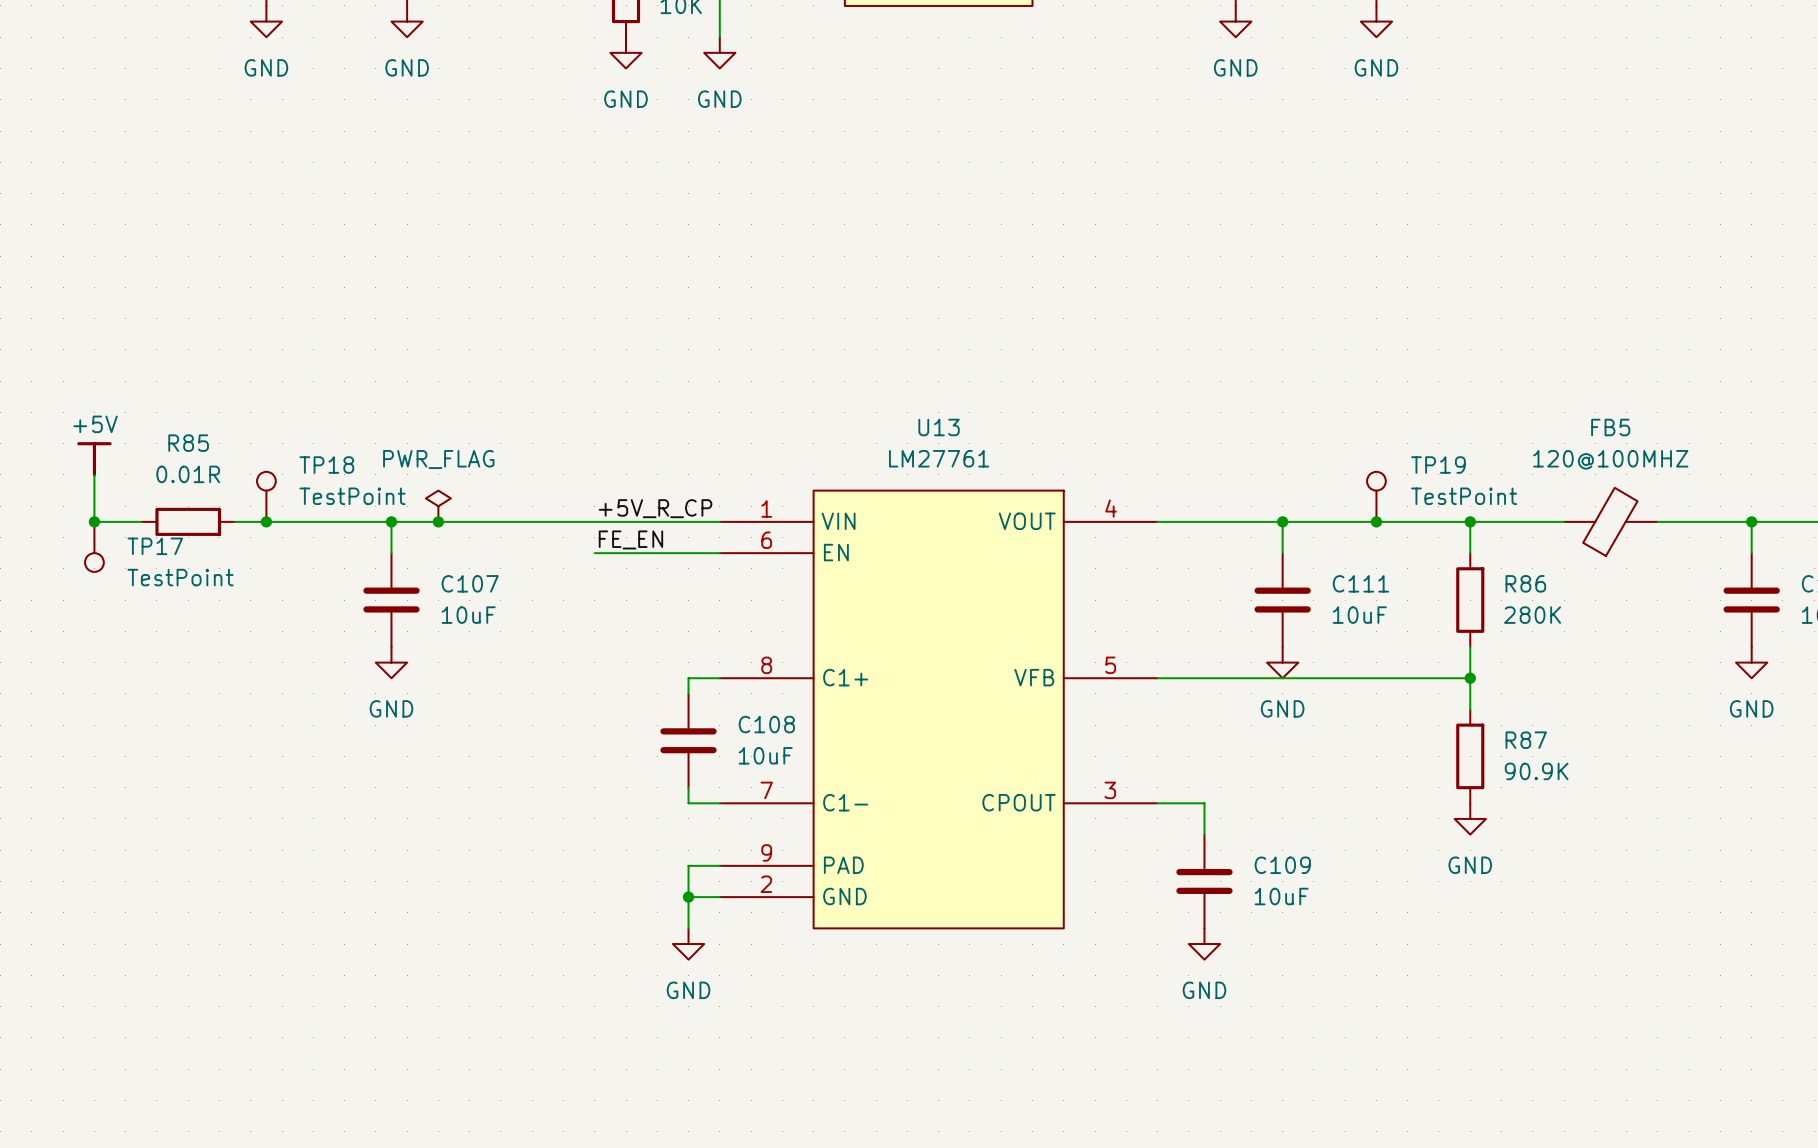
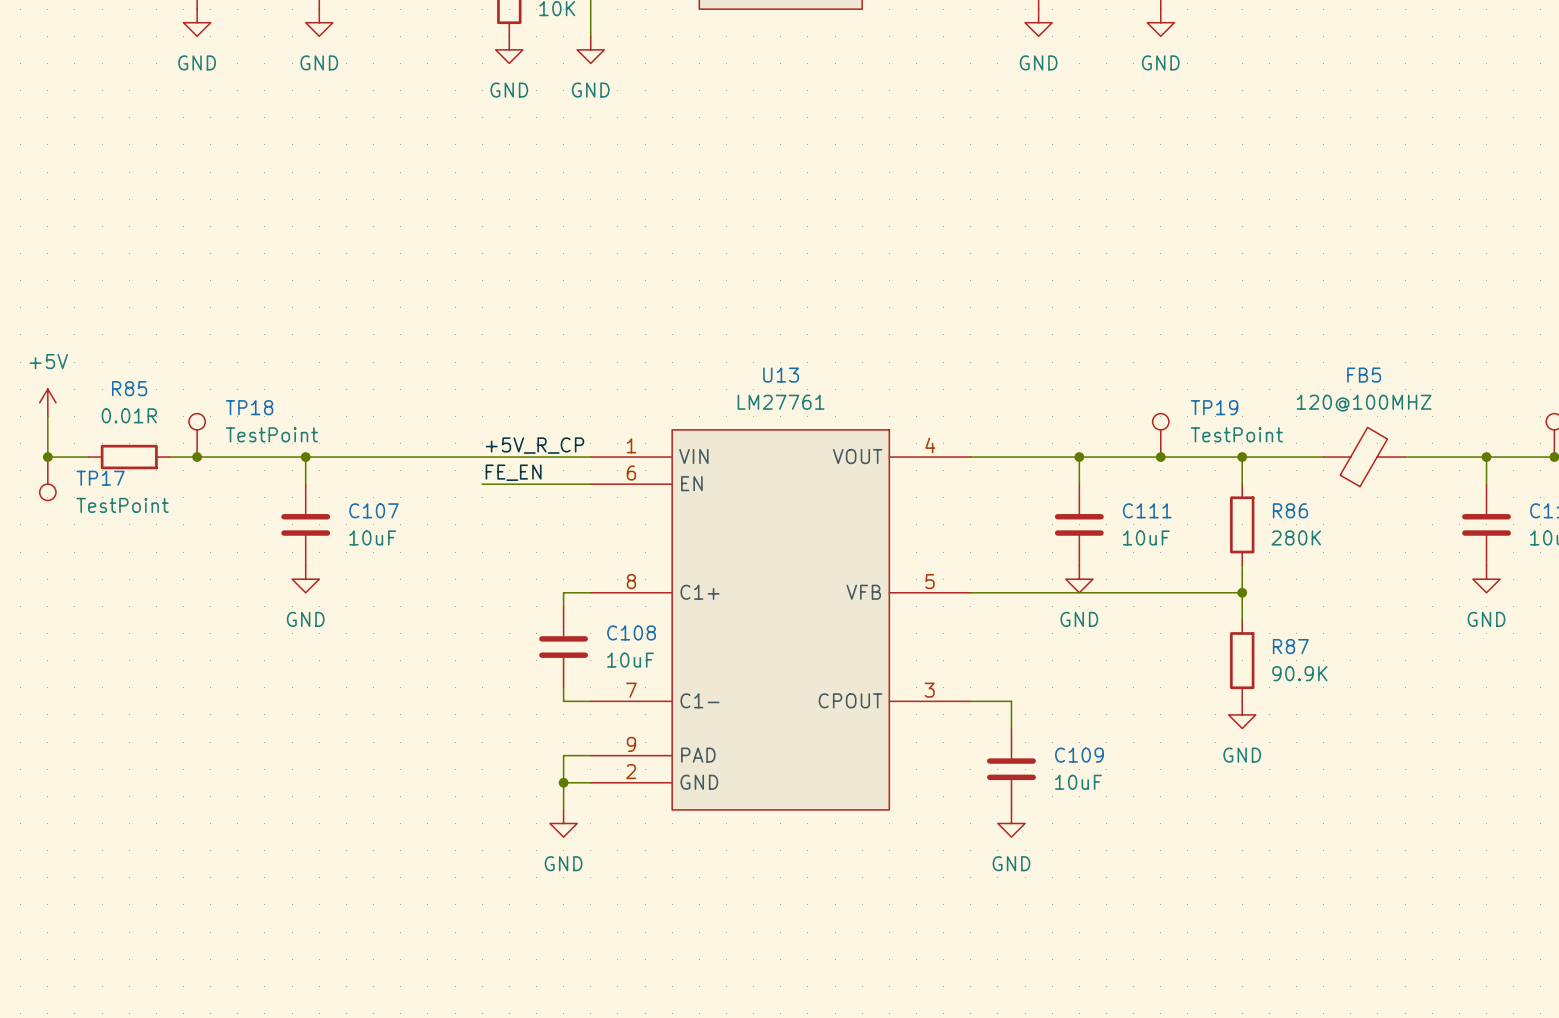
power symbol shape: [77, 442, 112, 477] -> [39, 389, 56, 417]
power symbol: PWR_FLAG (438, 506) -> none
junction: (438, 521) -> none

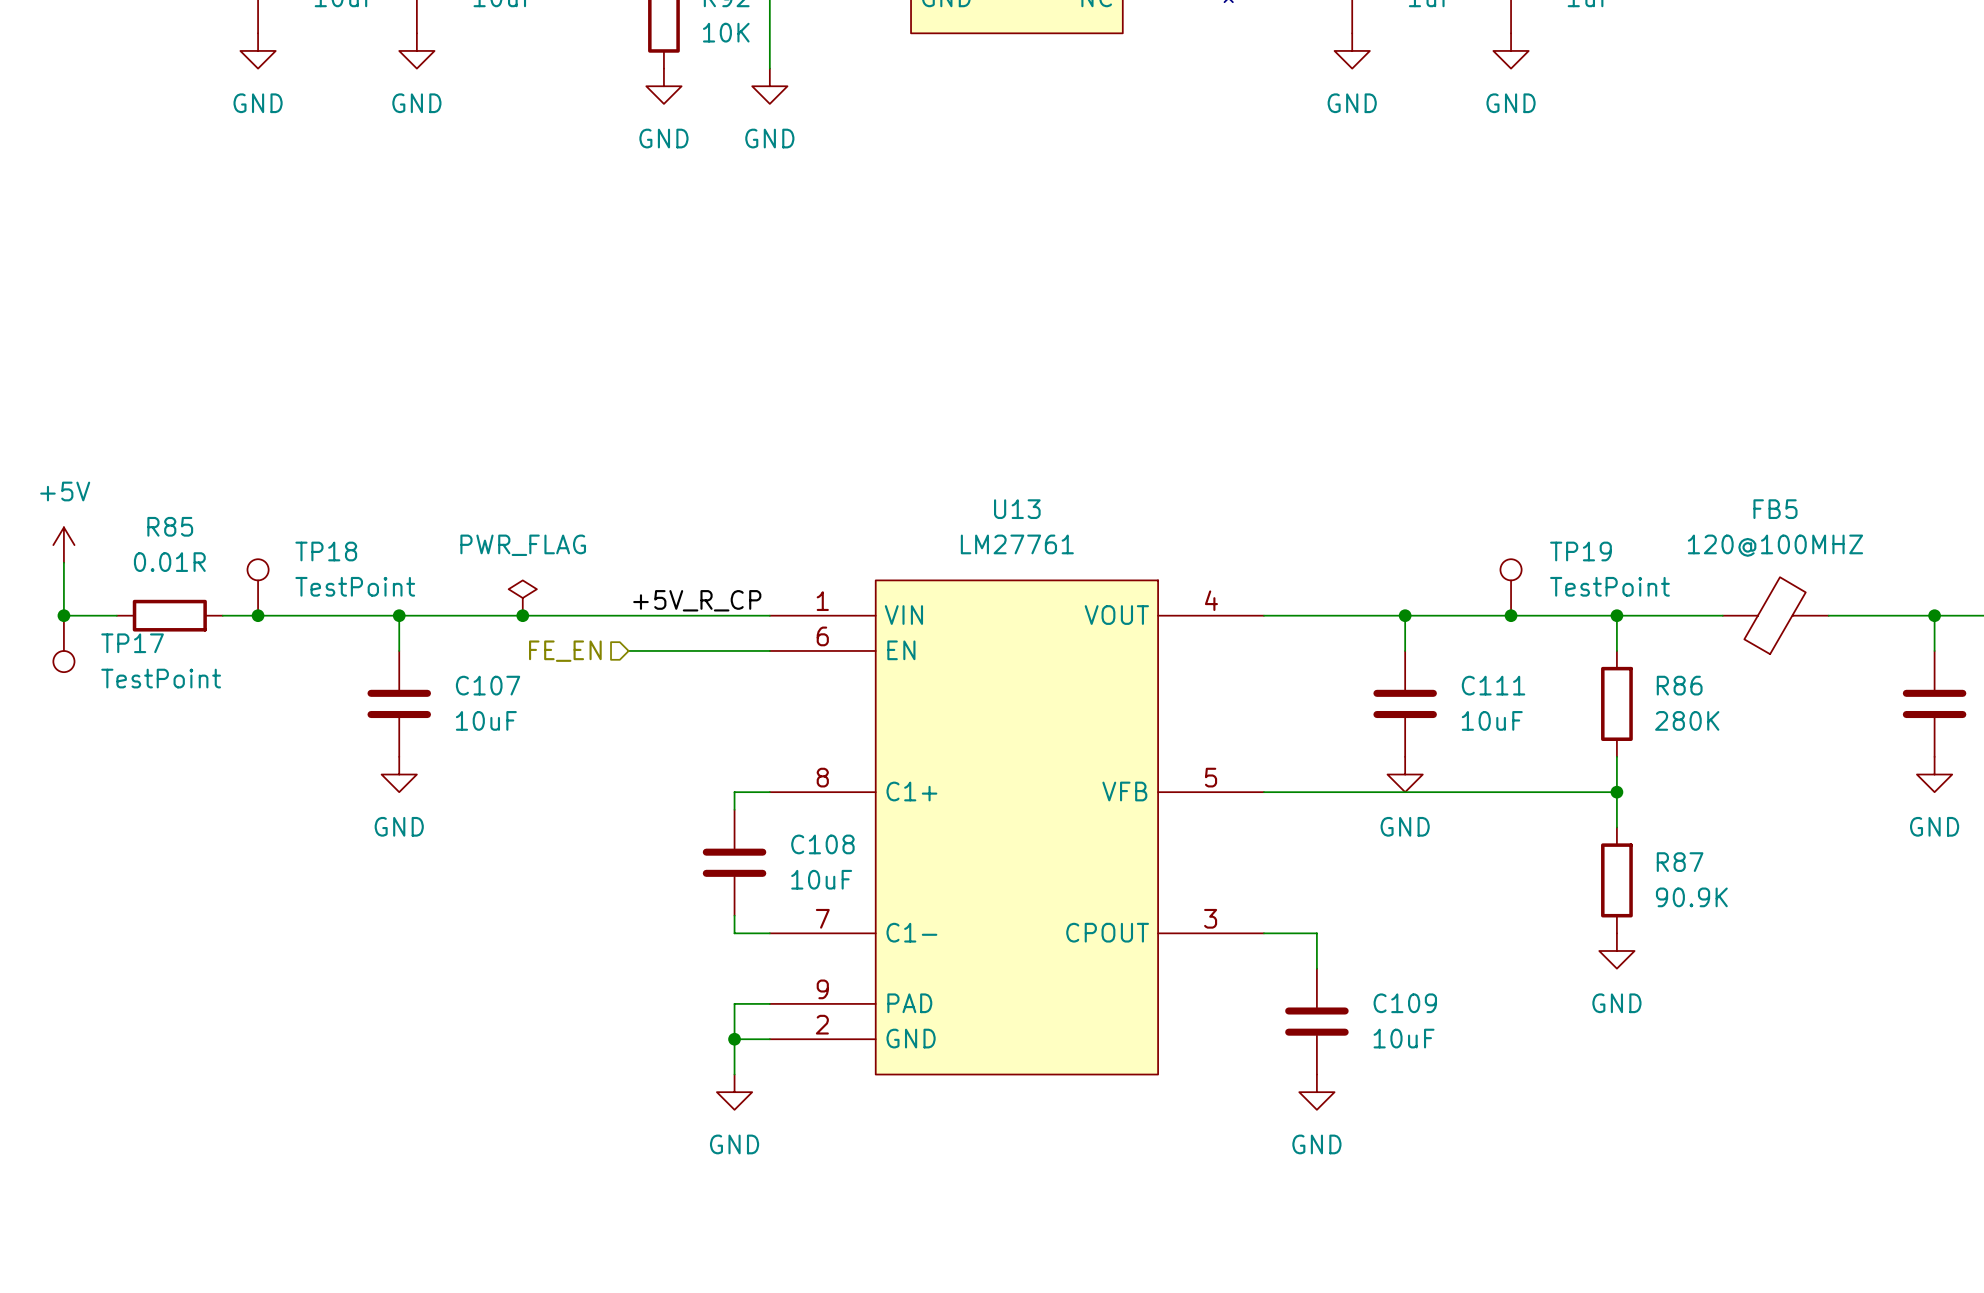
power symbol: none -> PWR_FLAG (522, 598)
junction: none -> (522, 615)
label: FE_EN (513, 472) -> none
hierarchical label: none -> FE_EN (565, 651)

